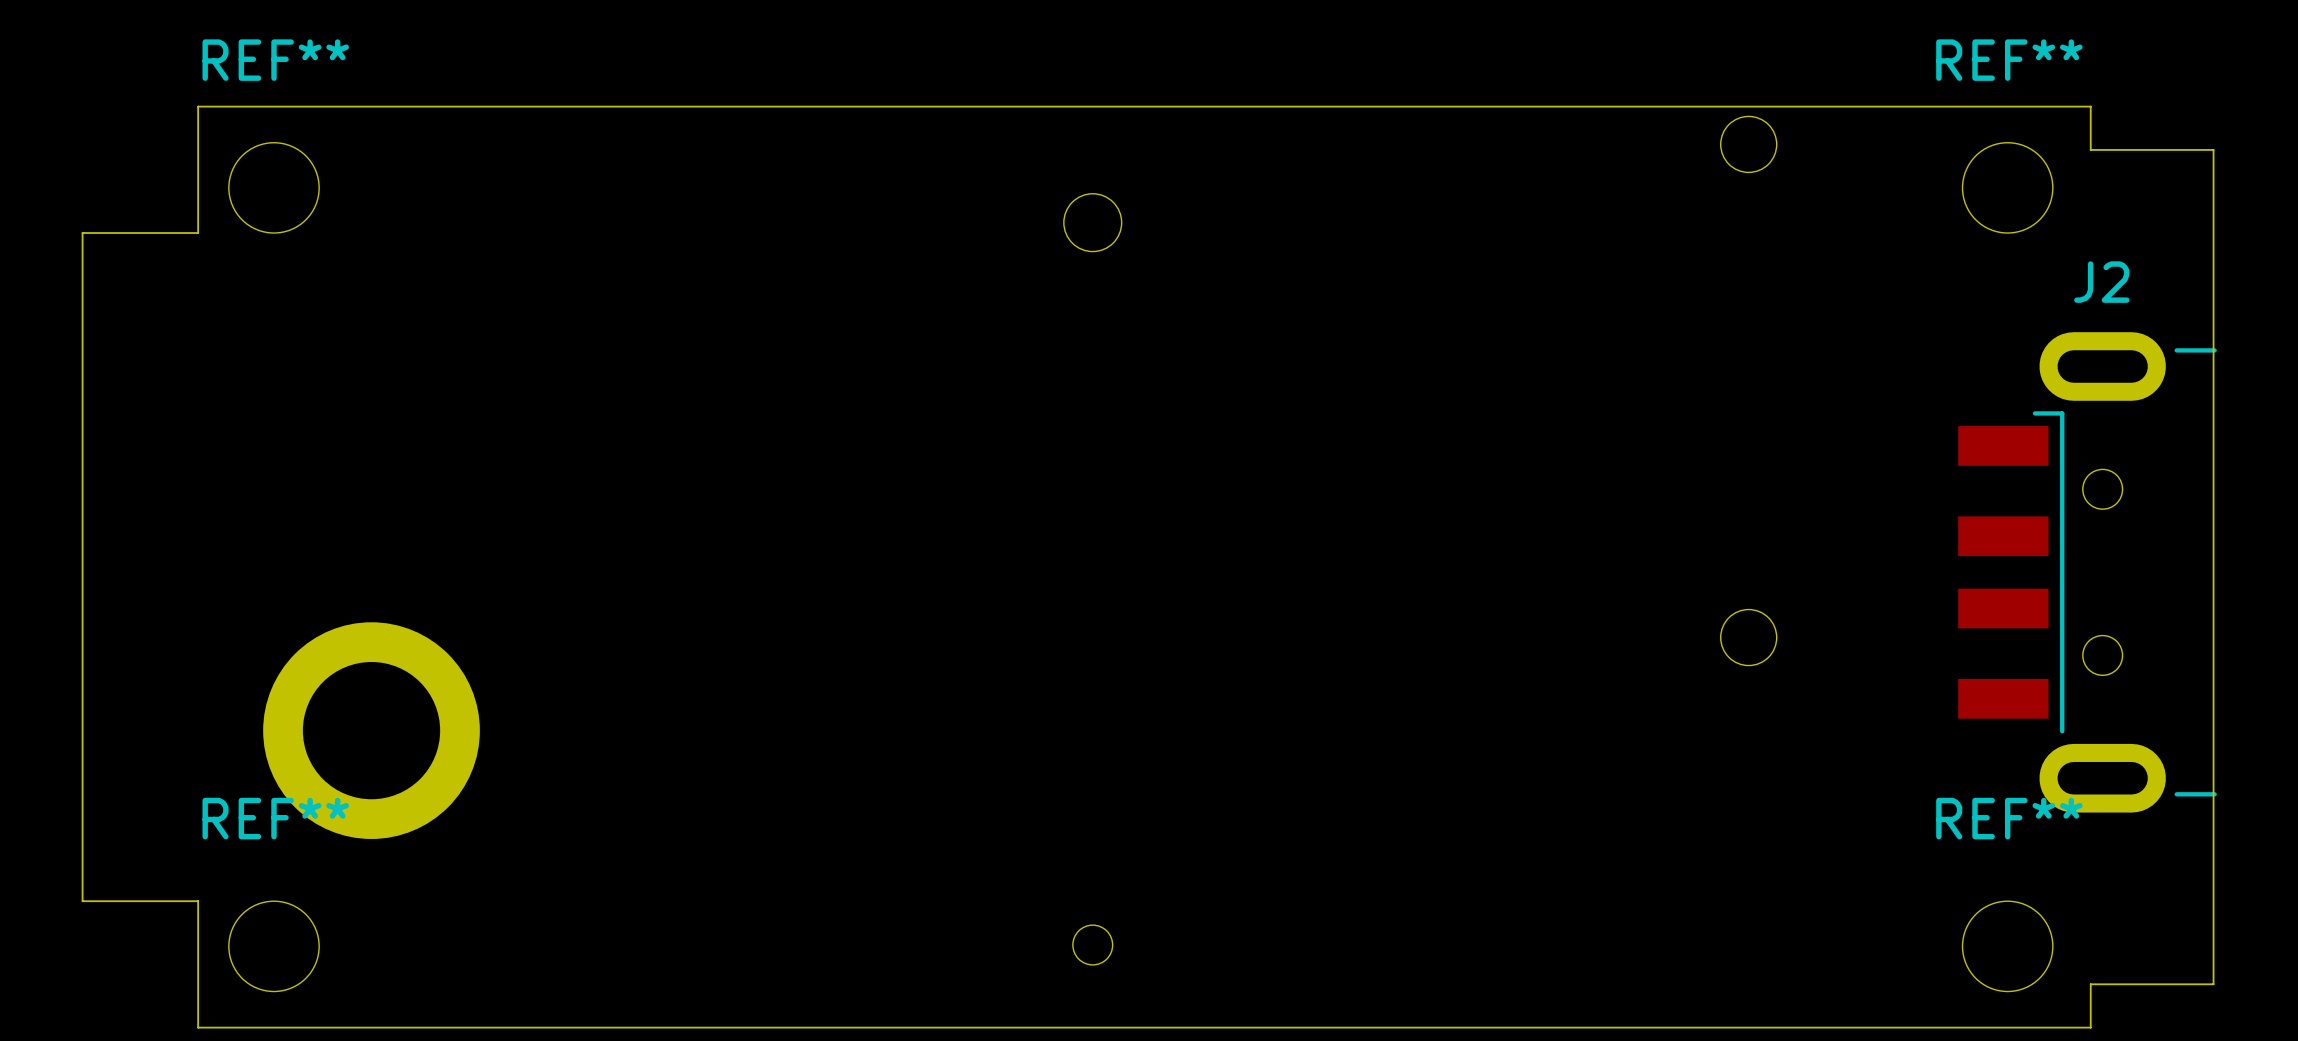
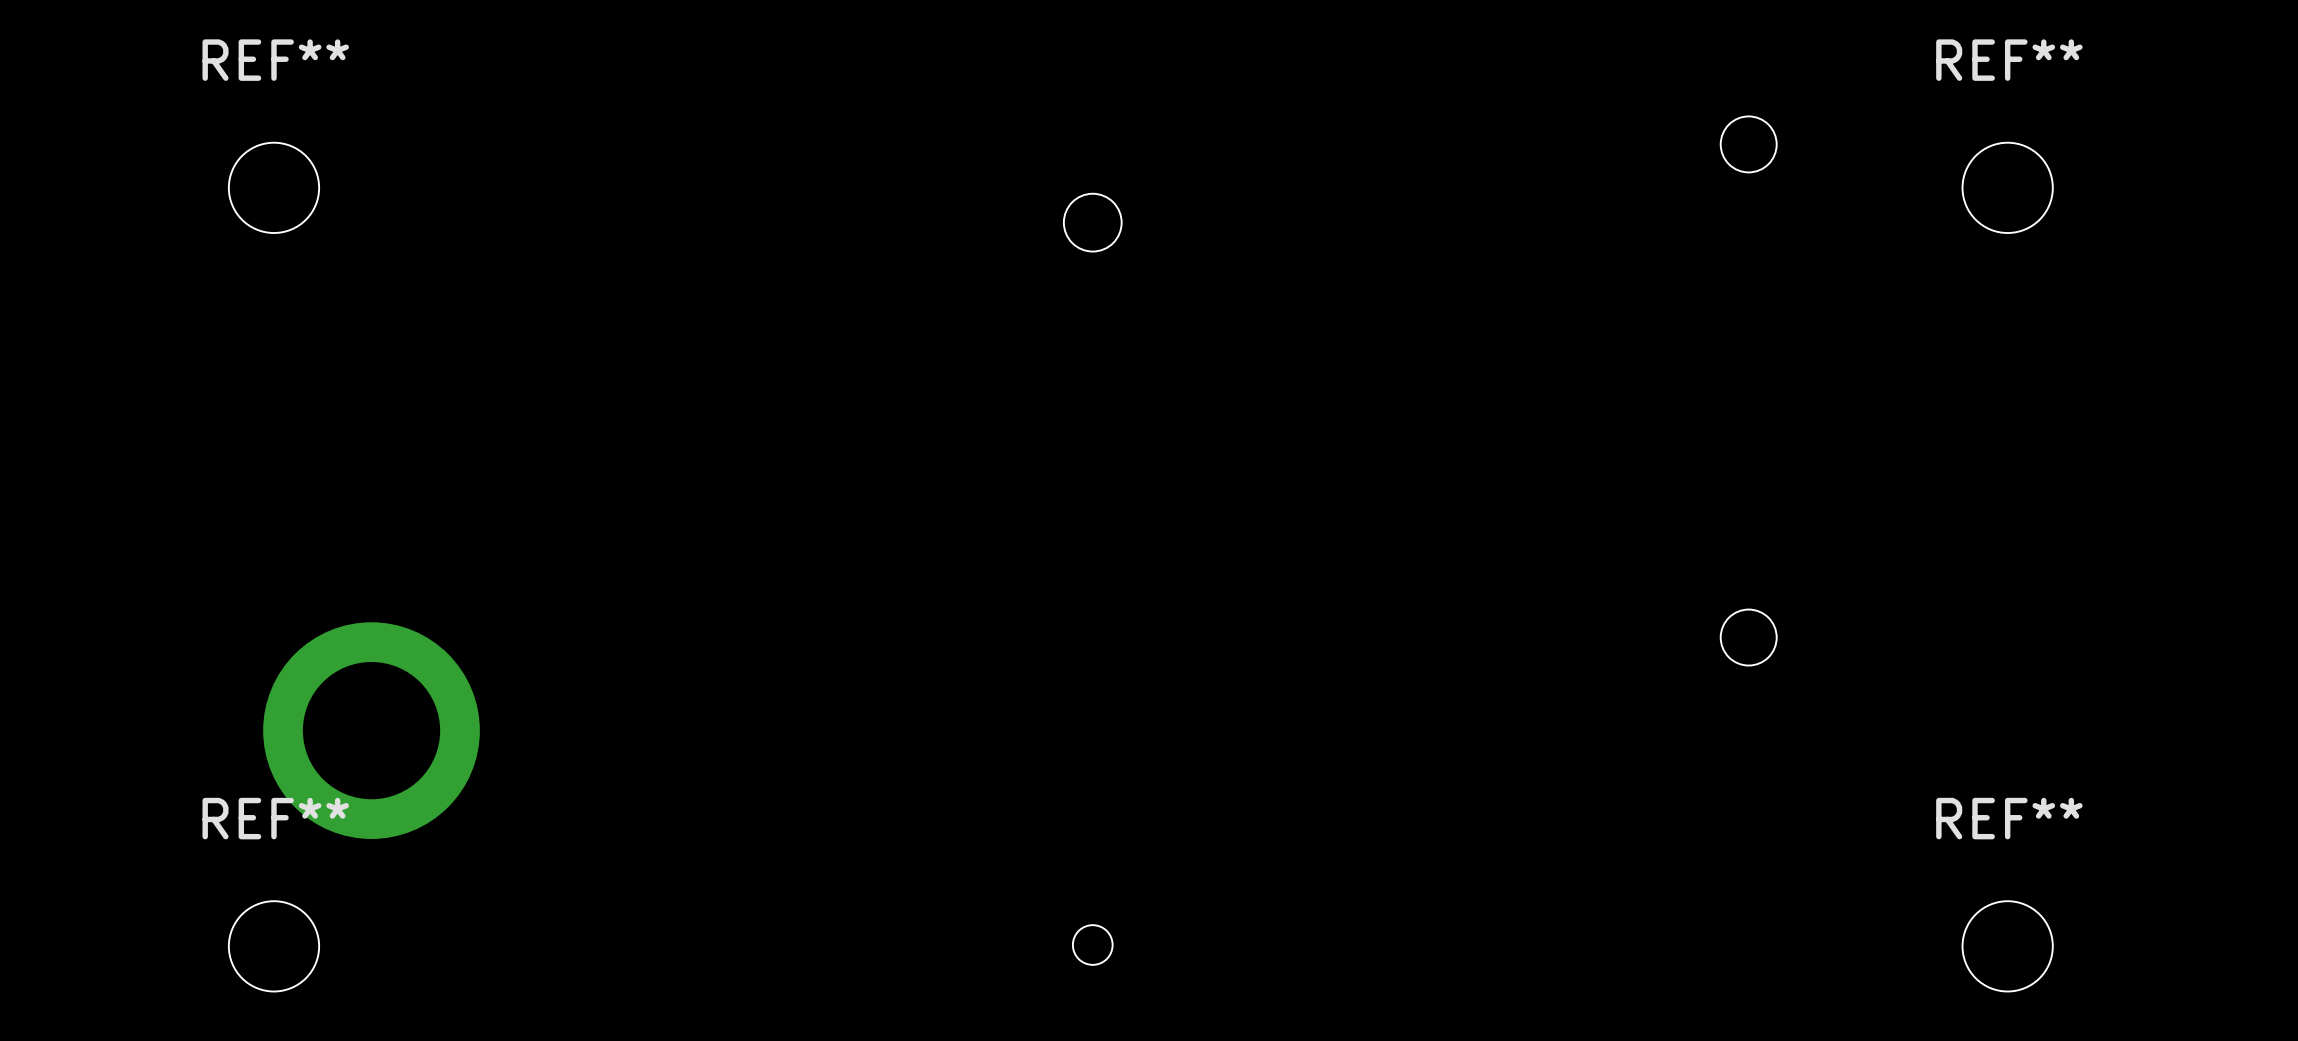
board edge: (198, 106) (2090, 106) (2090, 149) (2213, 149) (2213, 984) (2090, 984) (2090, 1027) (198, 1027) (198, 901) (82, 901) (82, 233) (198, 233) (198, 106) -> none
J2: (2087, 572) -> none

